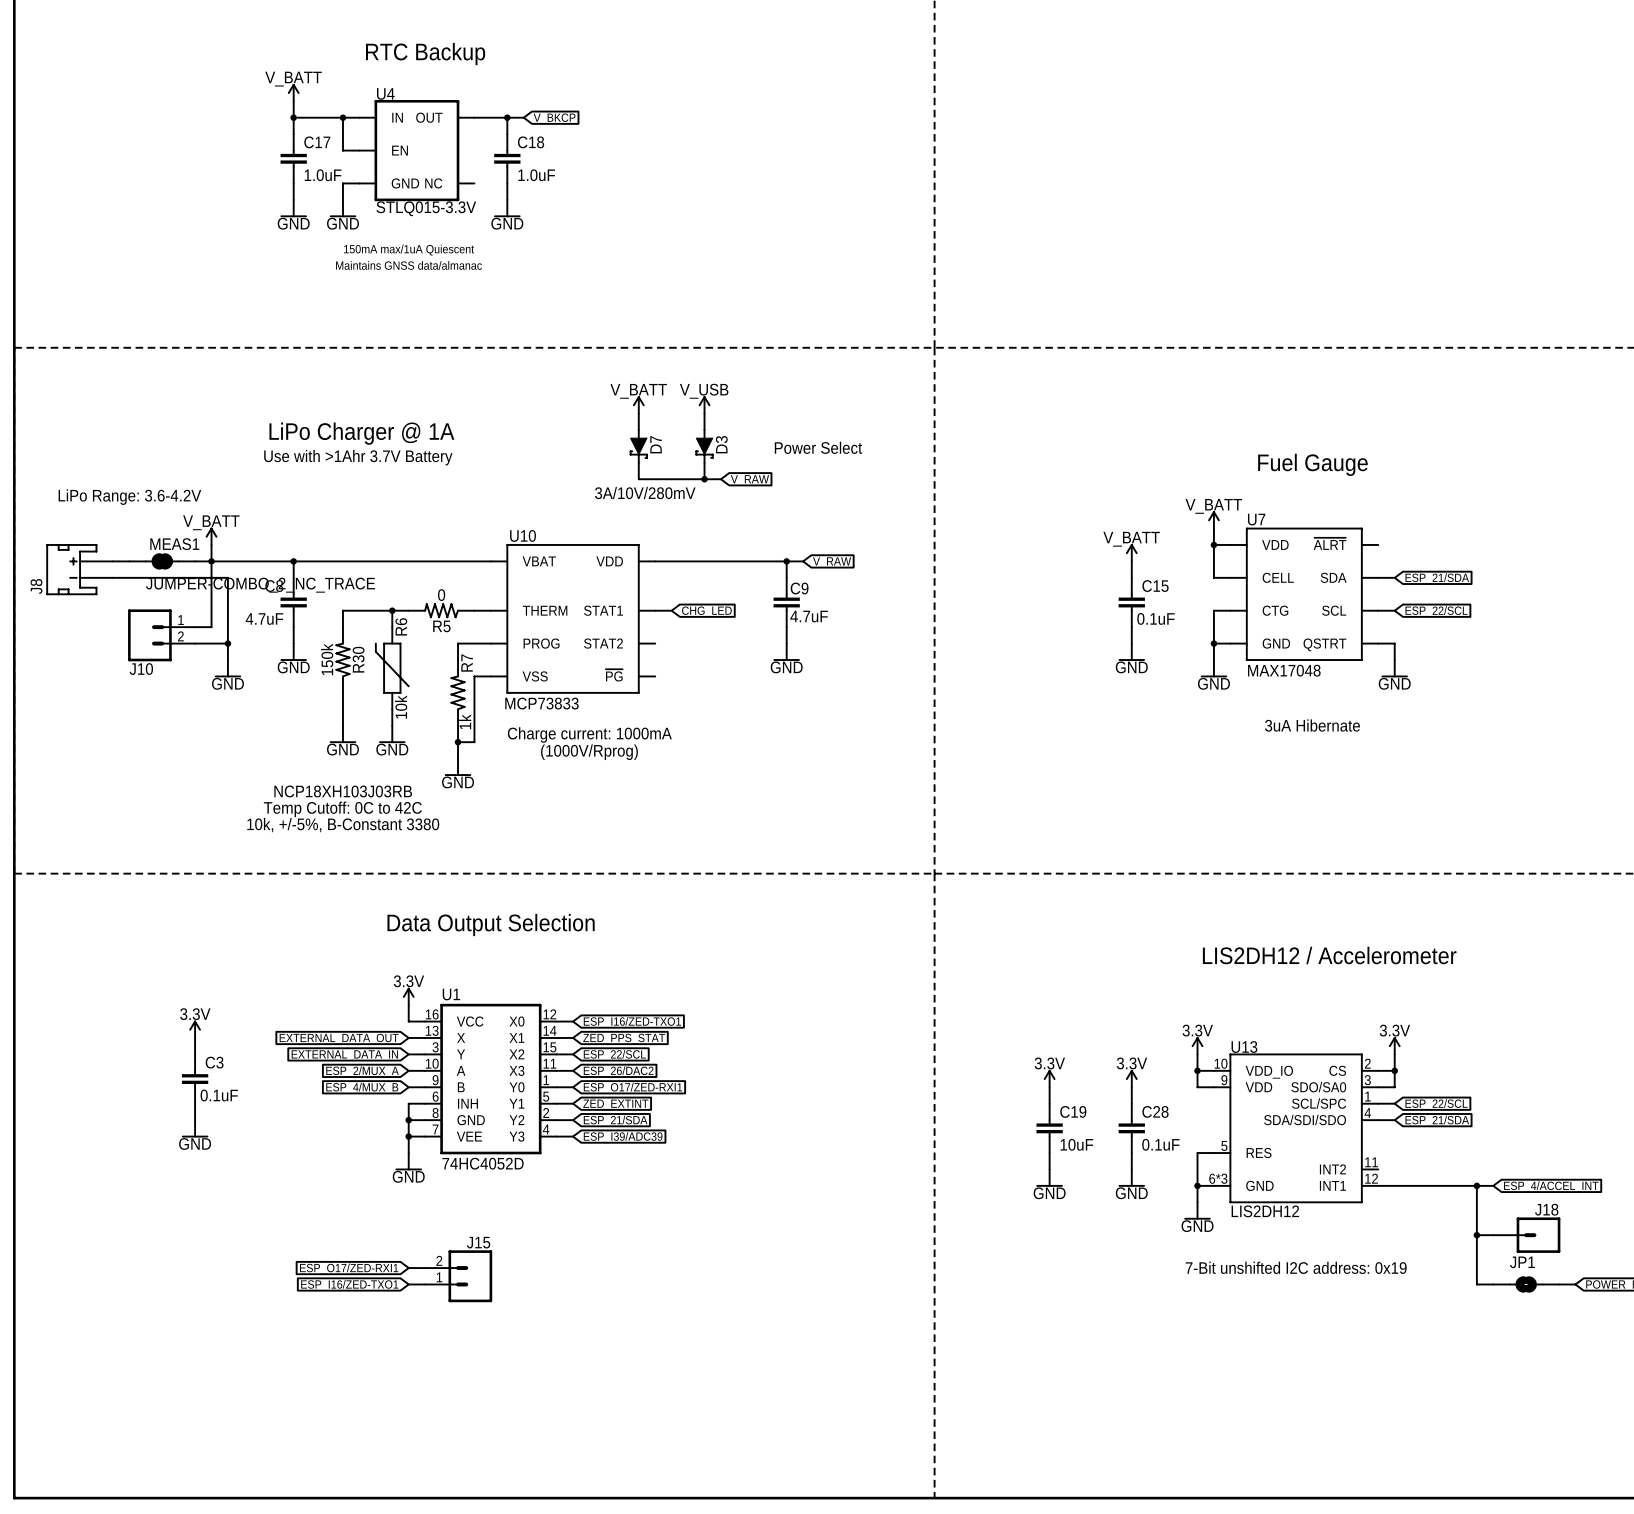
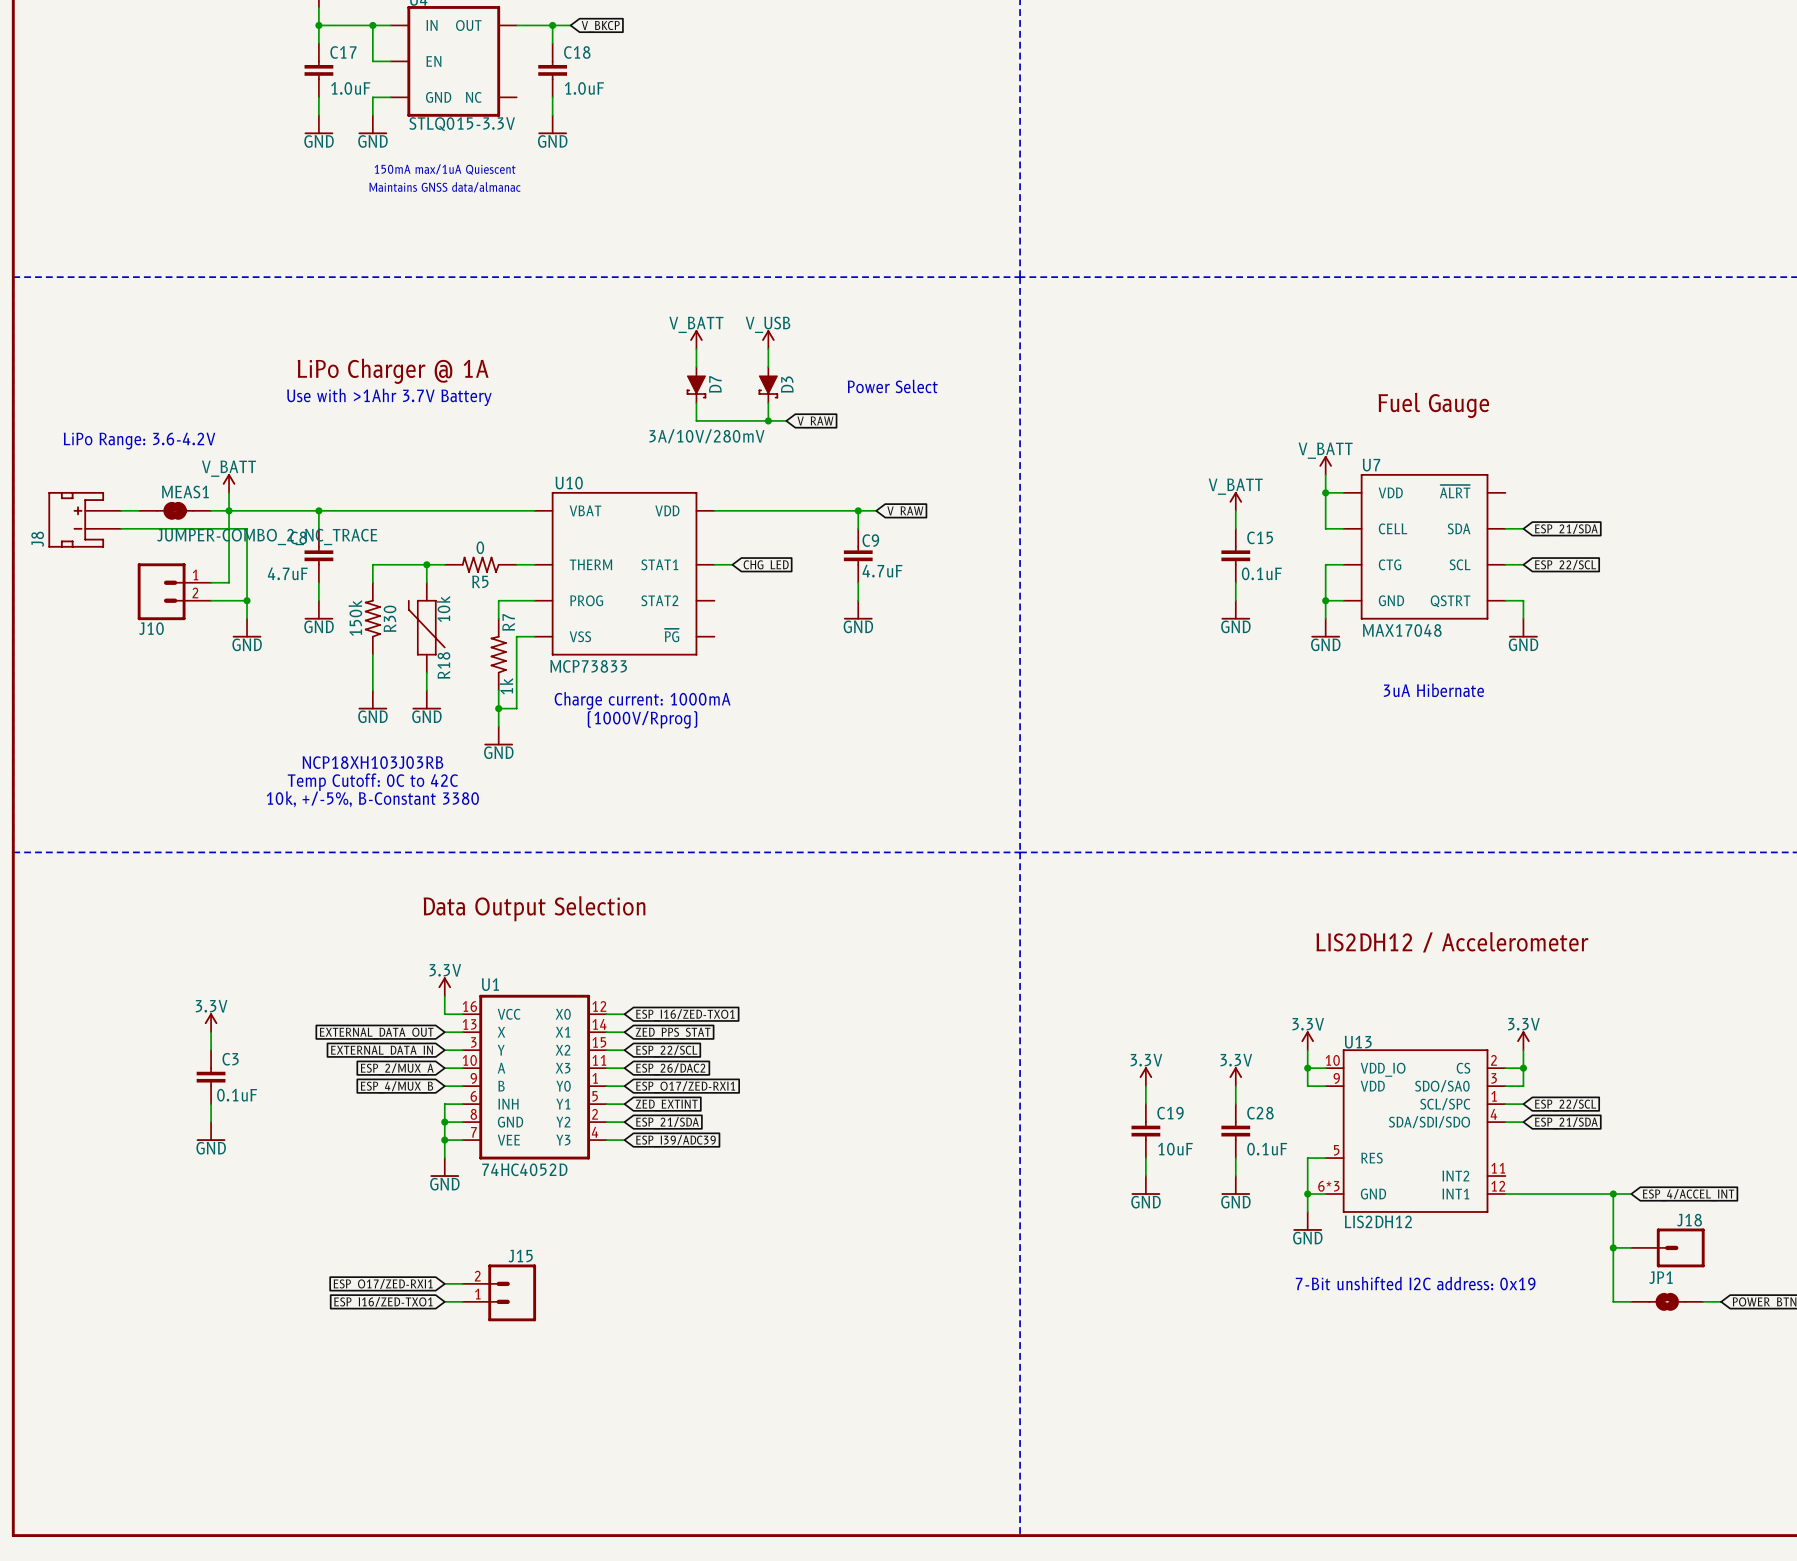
R6 name: R6 (401, 626) -> R18 (443, 665)
R6 value position: 10k (401, 707) -> 10k (443, 608)

